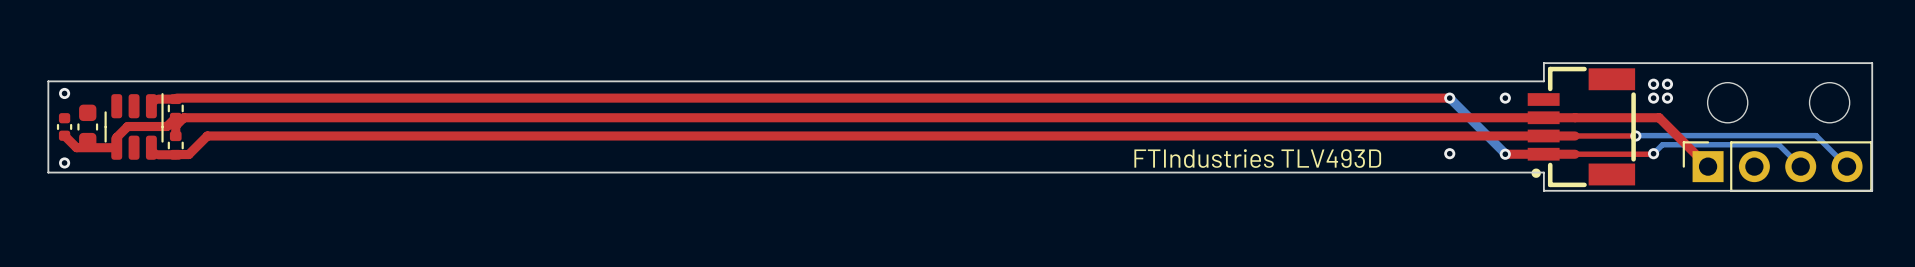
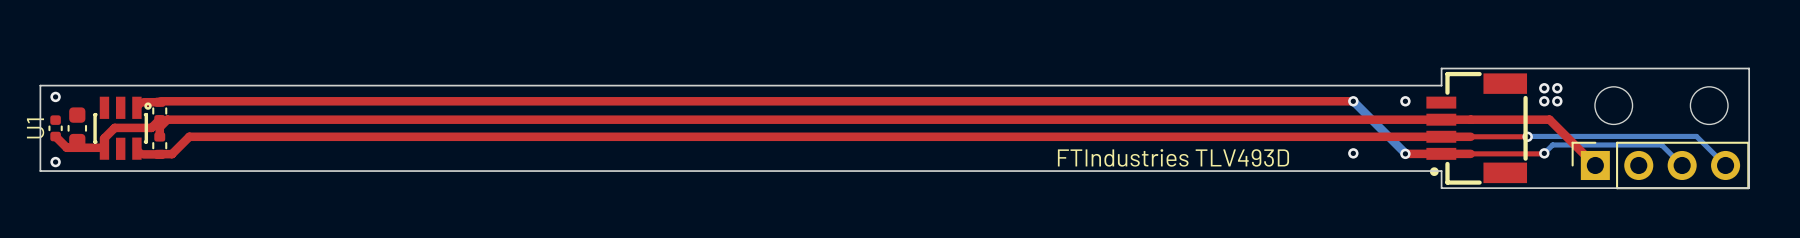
part: (134, 126) -> none
U1: none -> (122, 128)

